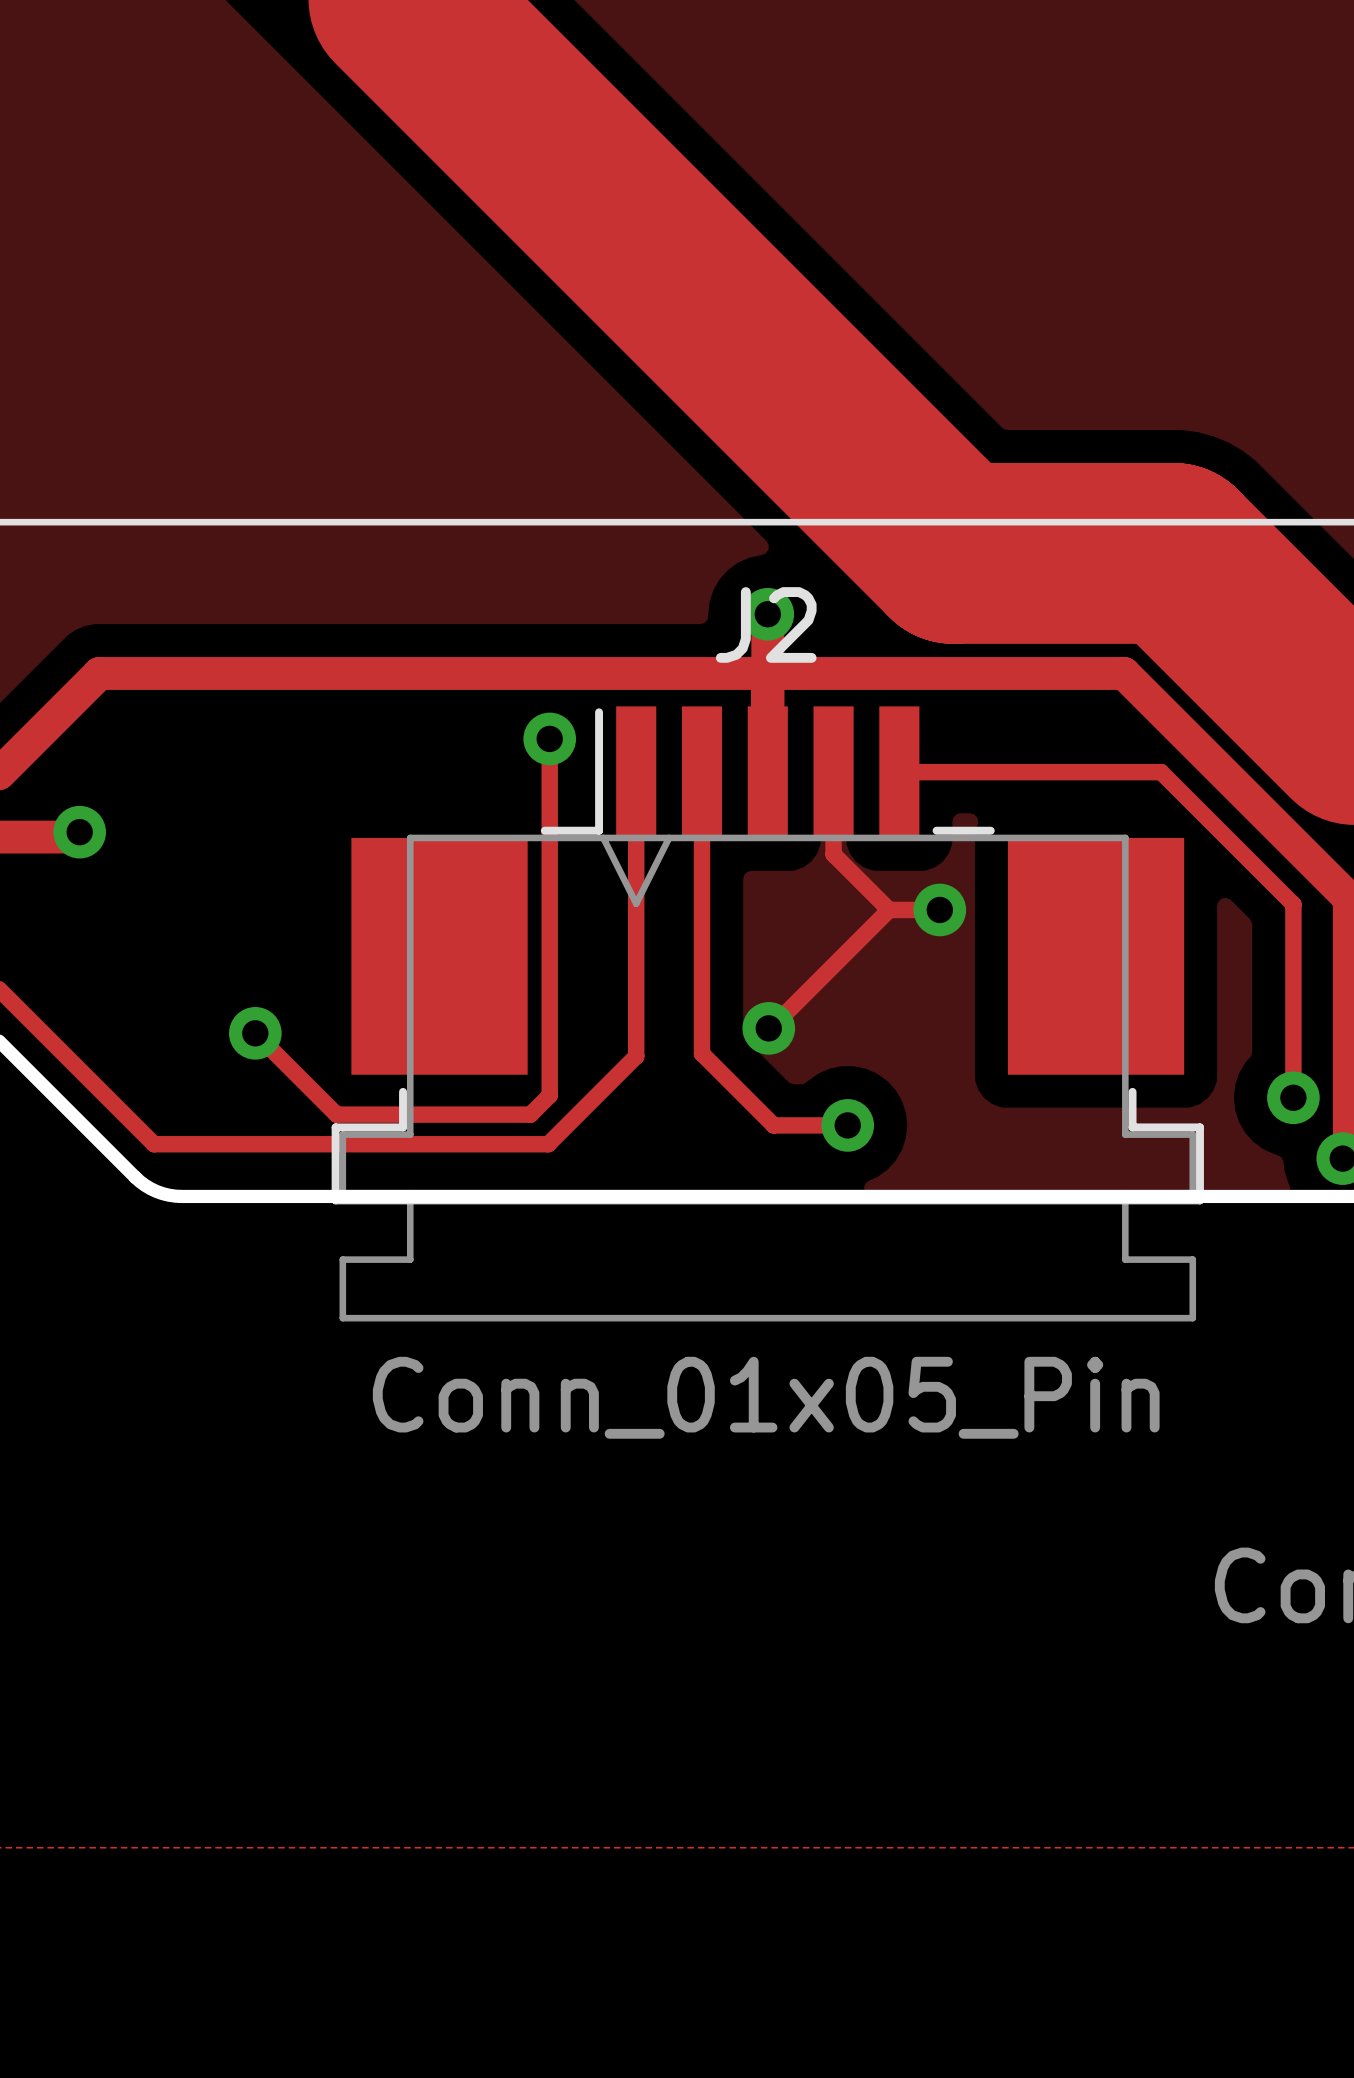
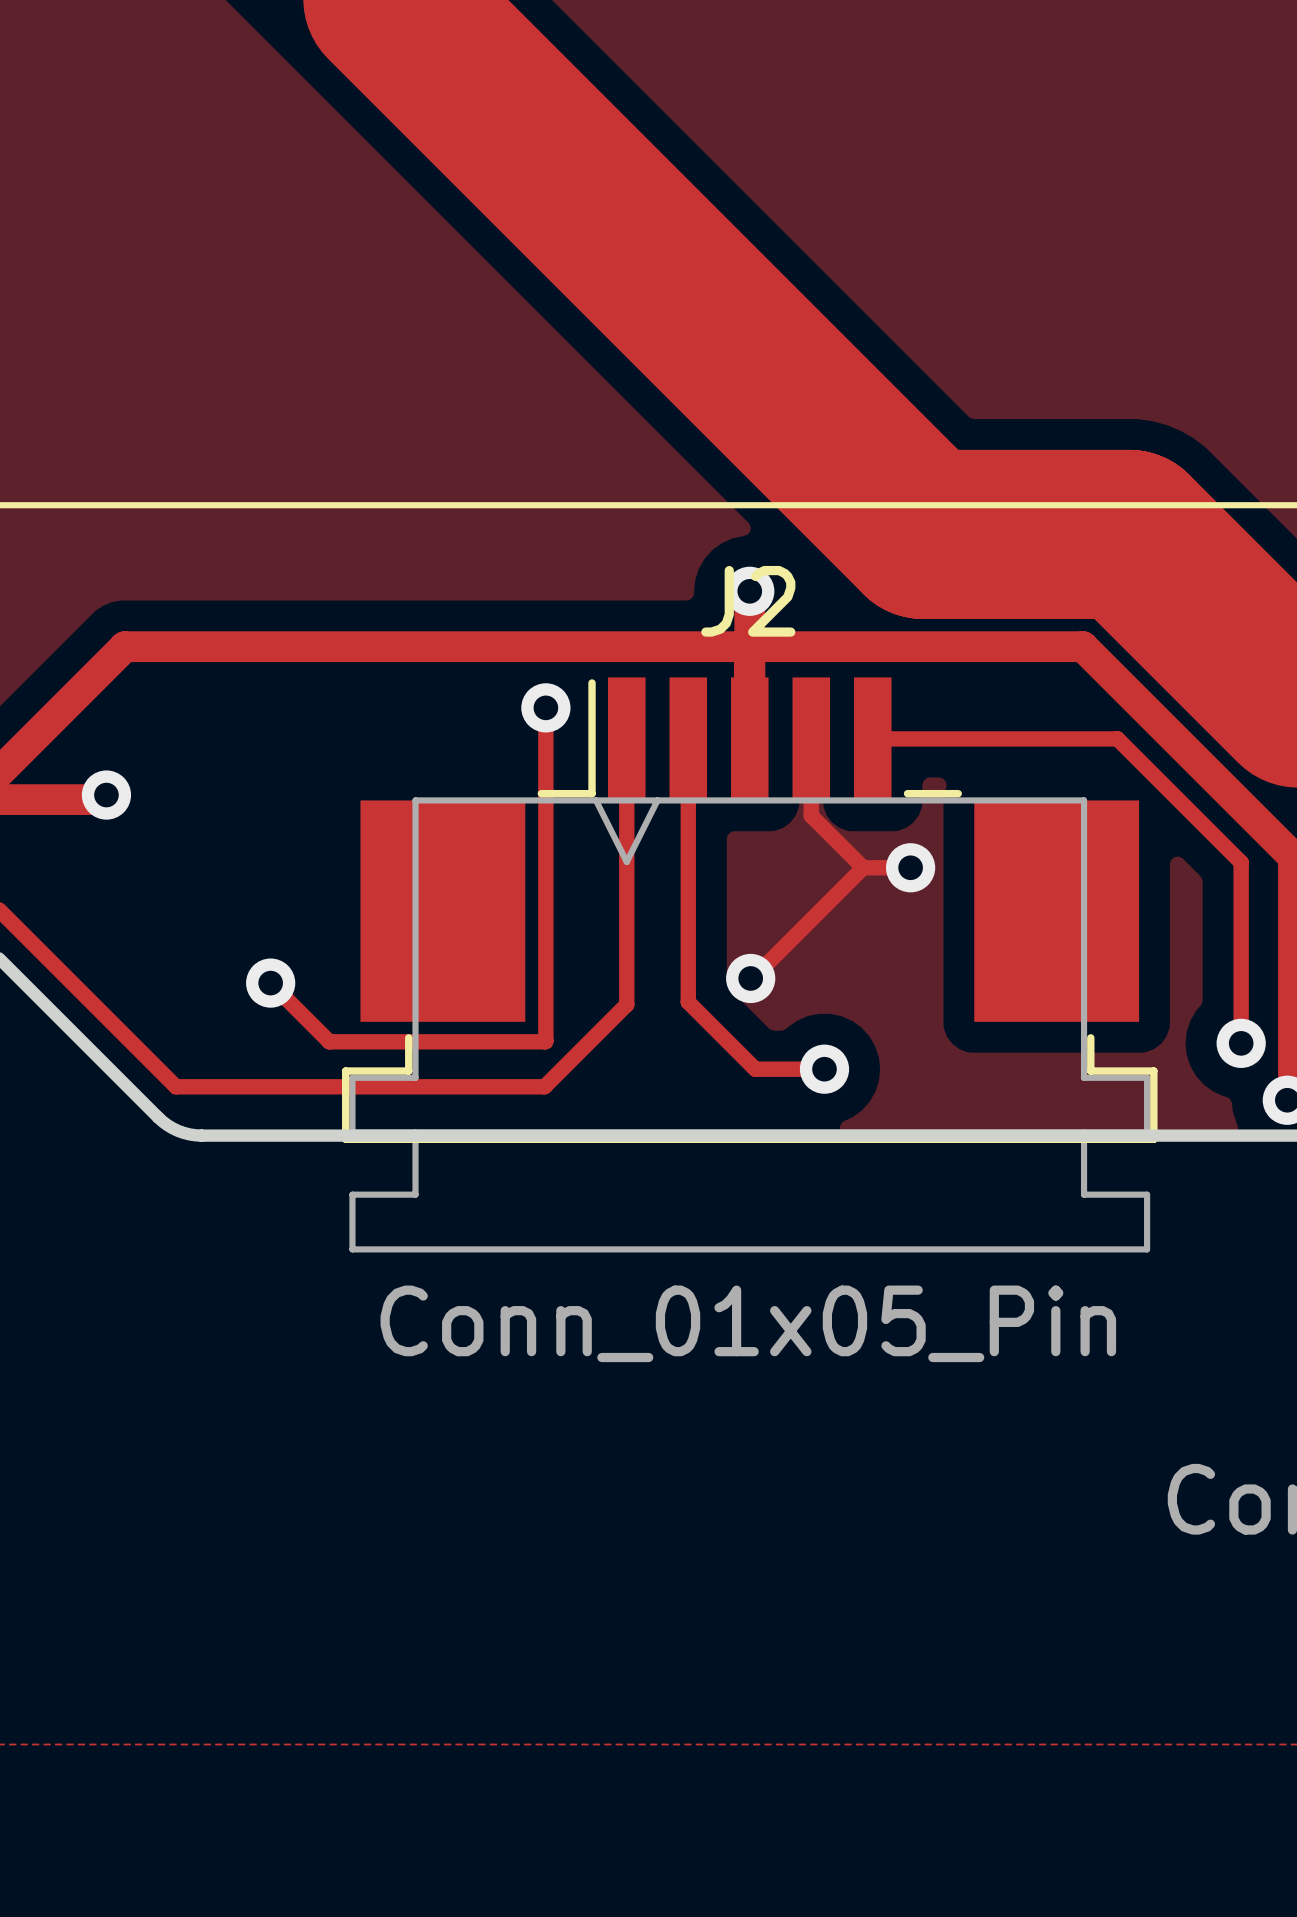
track: (318, 1096) (336, 1114) (530, 1114) (549, 1096) -> (329, 1041) (545, 1041)

